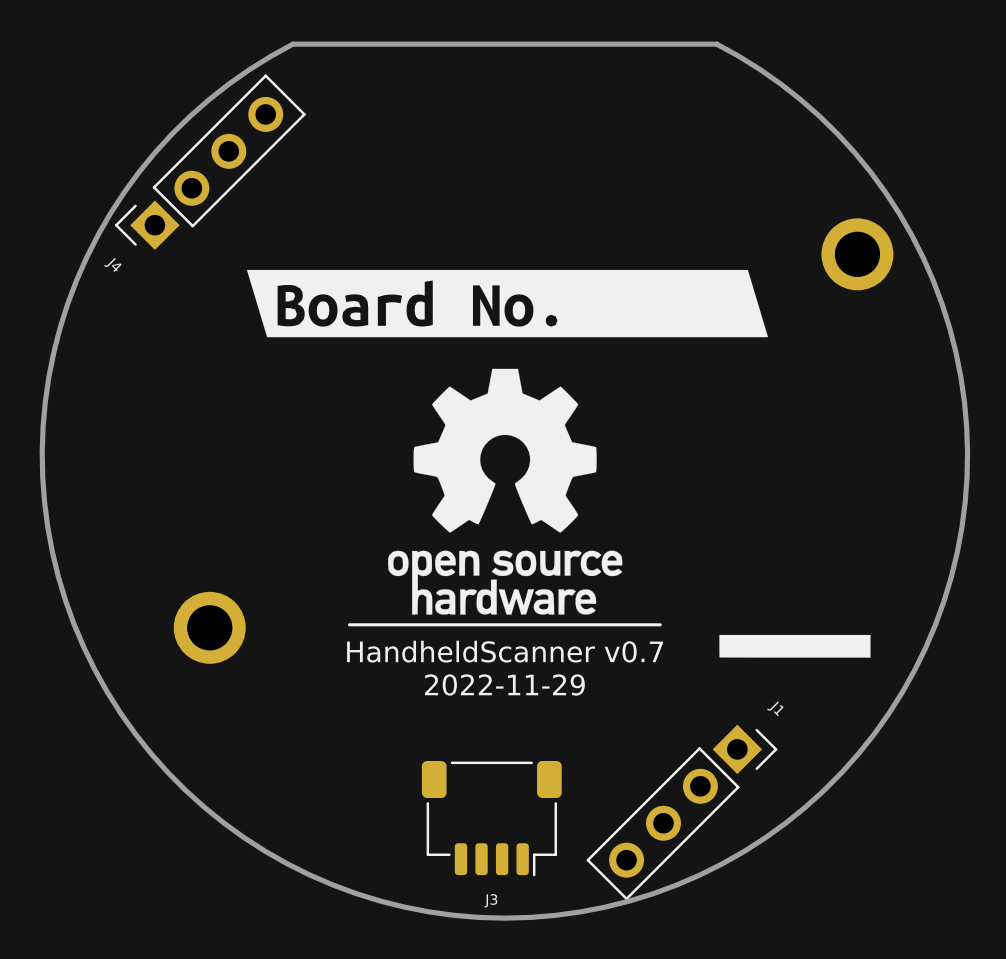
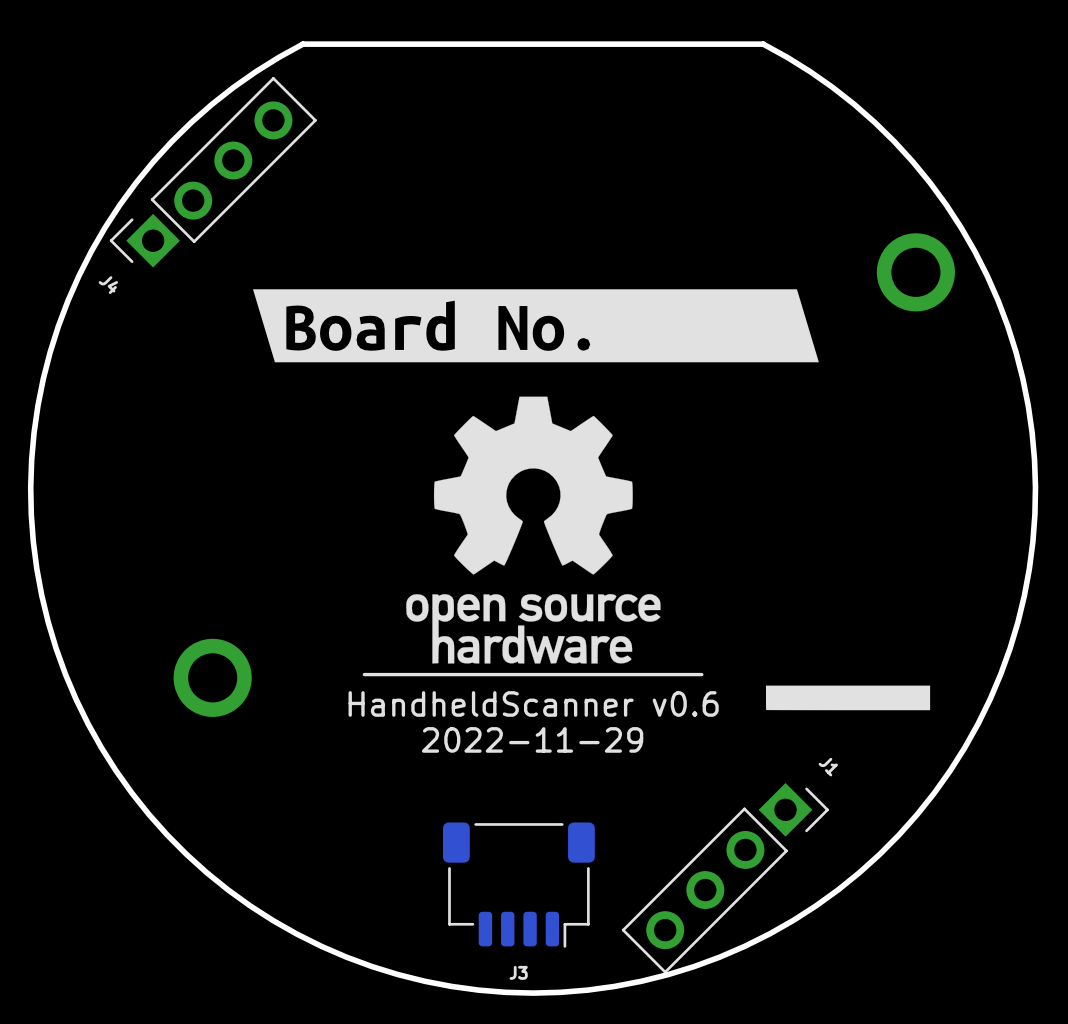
text: HandheldScanner v0.7 (505, 651) -> HandheldScanner v0.6 (533, 703)

